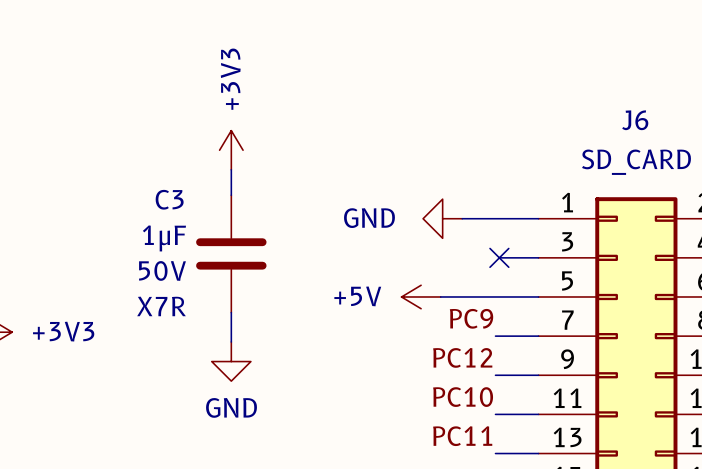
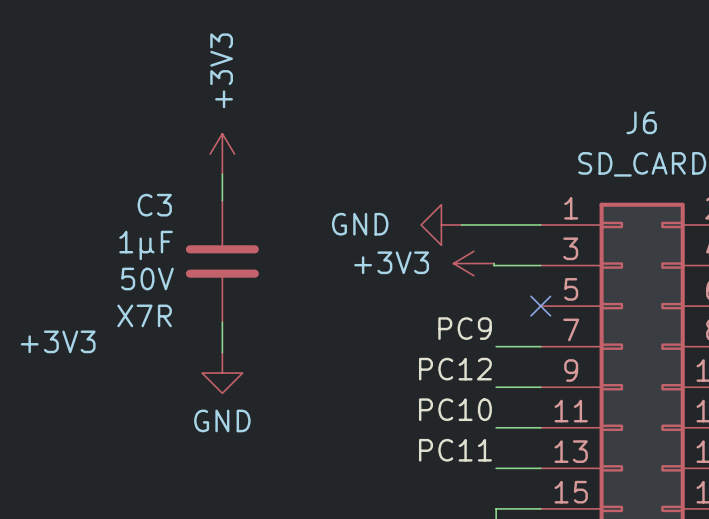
power symbol: none -> +3V3 (473, 263)
wire: none -> (494, 263) (494, 265) (500, 265)
no-connect mark position: (499, 257) -> (540, 306)
power symbol: +5V (421, 296) -> none
wire: (440, 296) (538, 296) -> none

